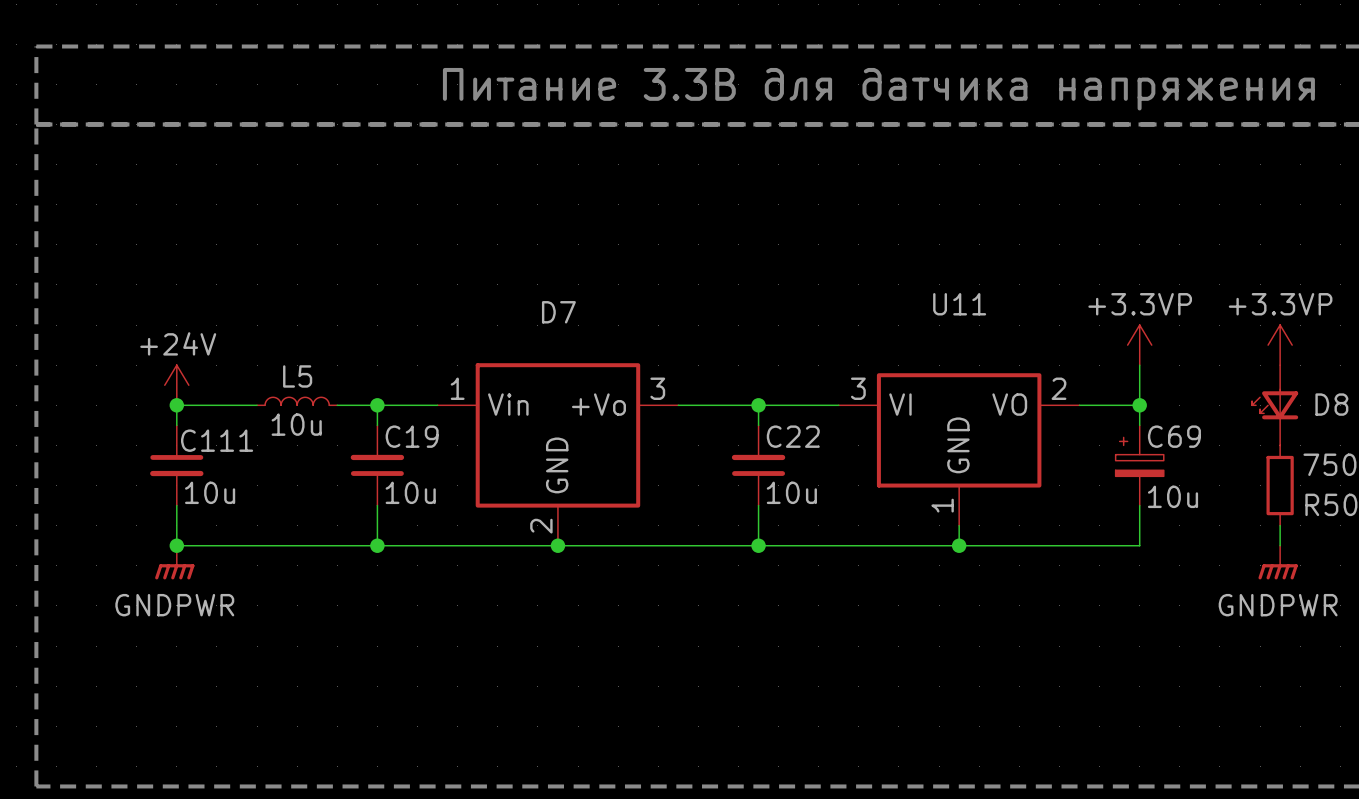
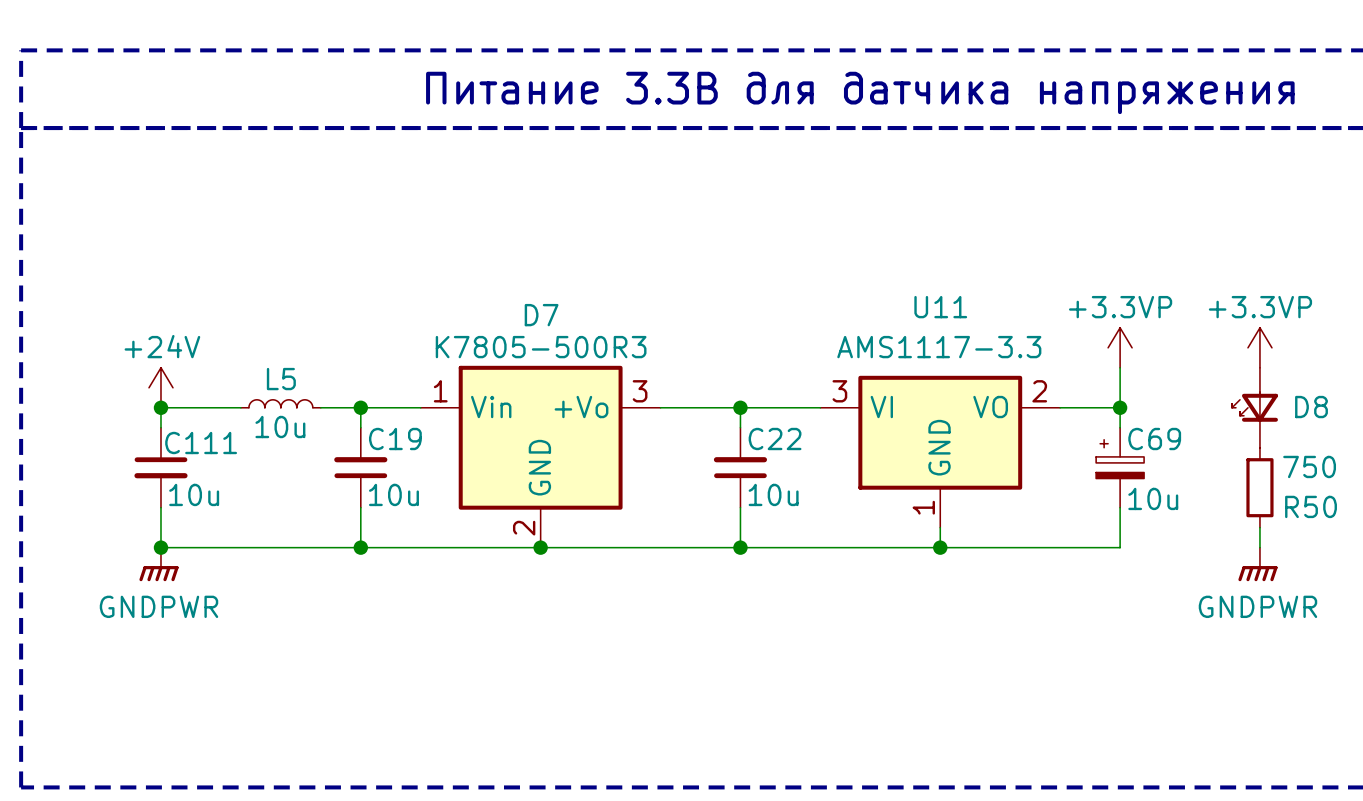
D7 value: none -> K7805-500R3 (541, 347)
U11 value: none -> AMS1117-3.3 (939, 347)

